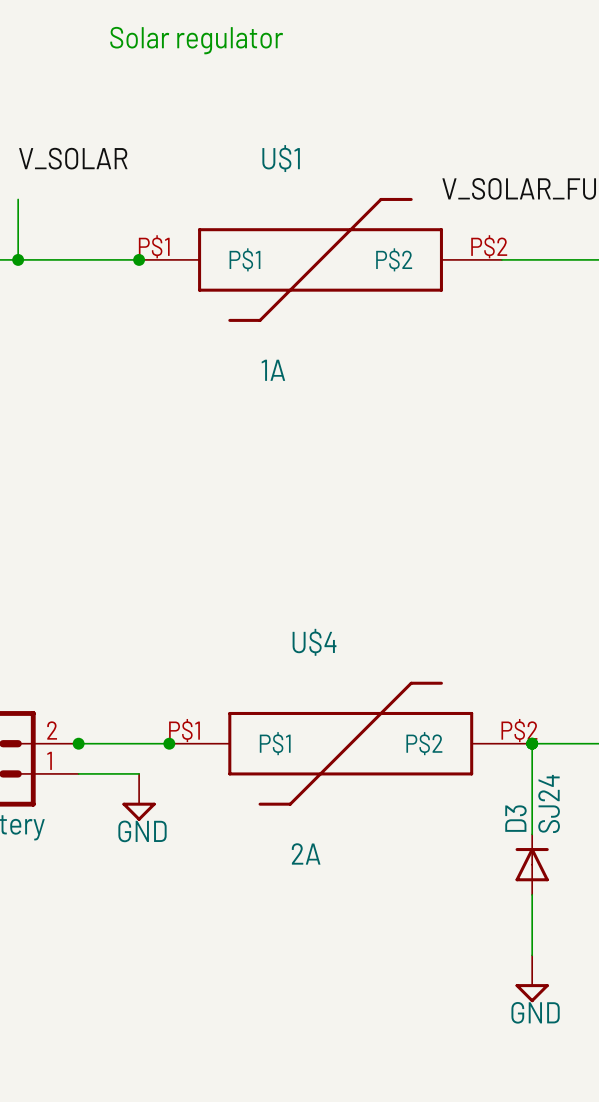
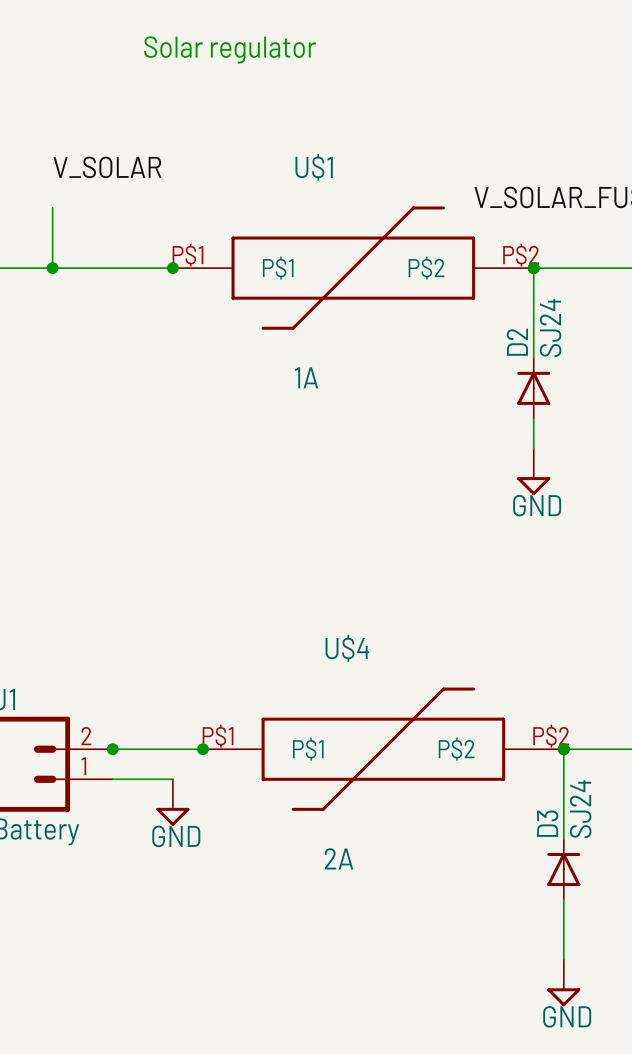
wire: none -> (533, 268) (533, 358)
junction: none -> (533, 268)
D2: none -> SJ24 (533, 388)
wire: none -> (533, 418) (533, 448)
power symbol: none -> GND (533, 471)

